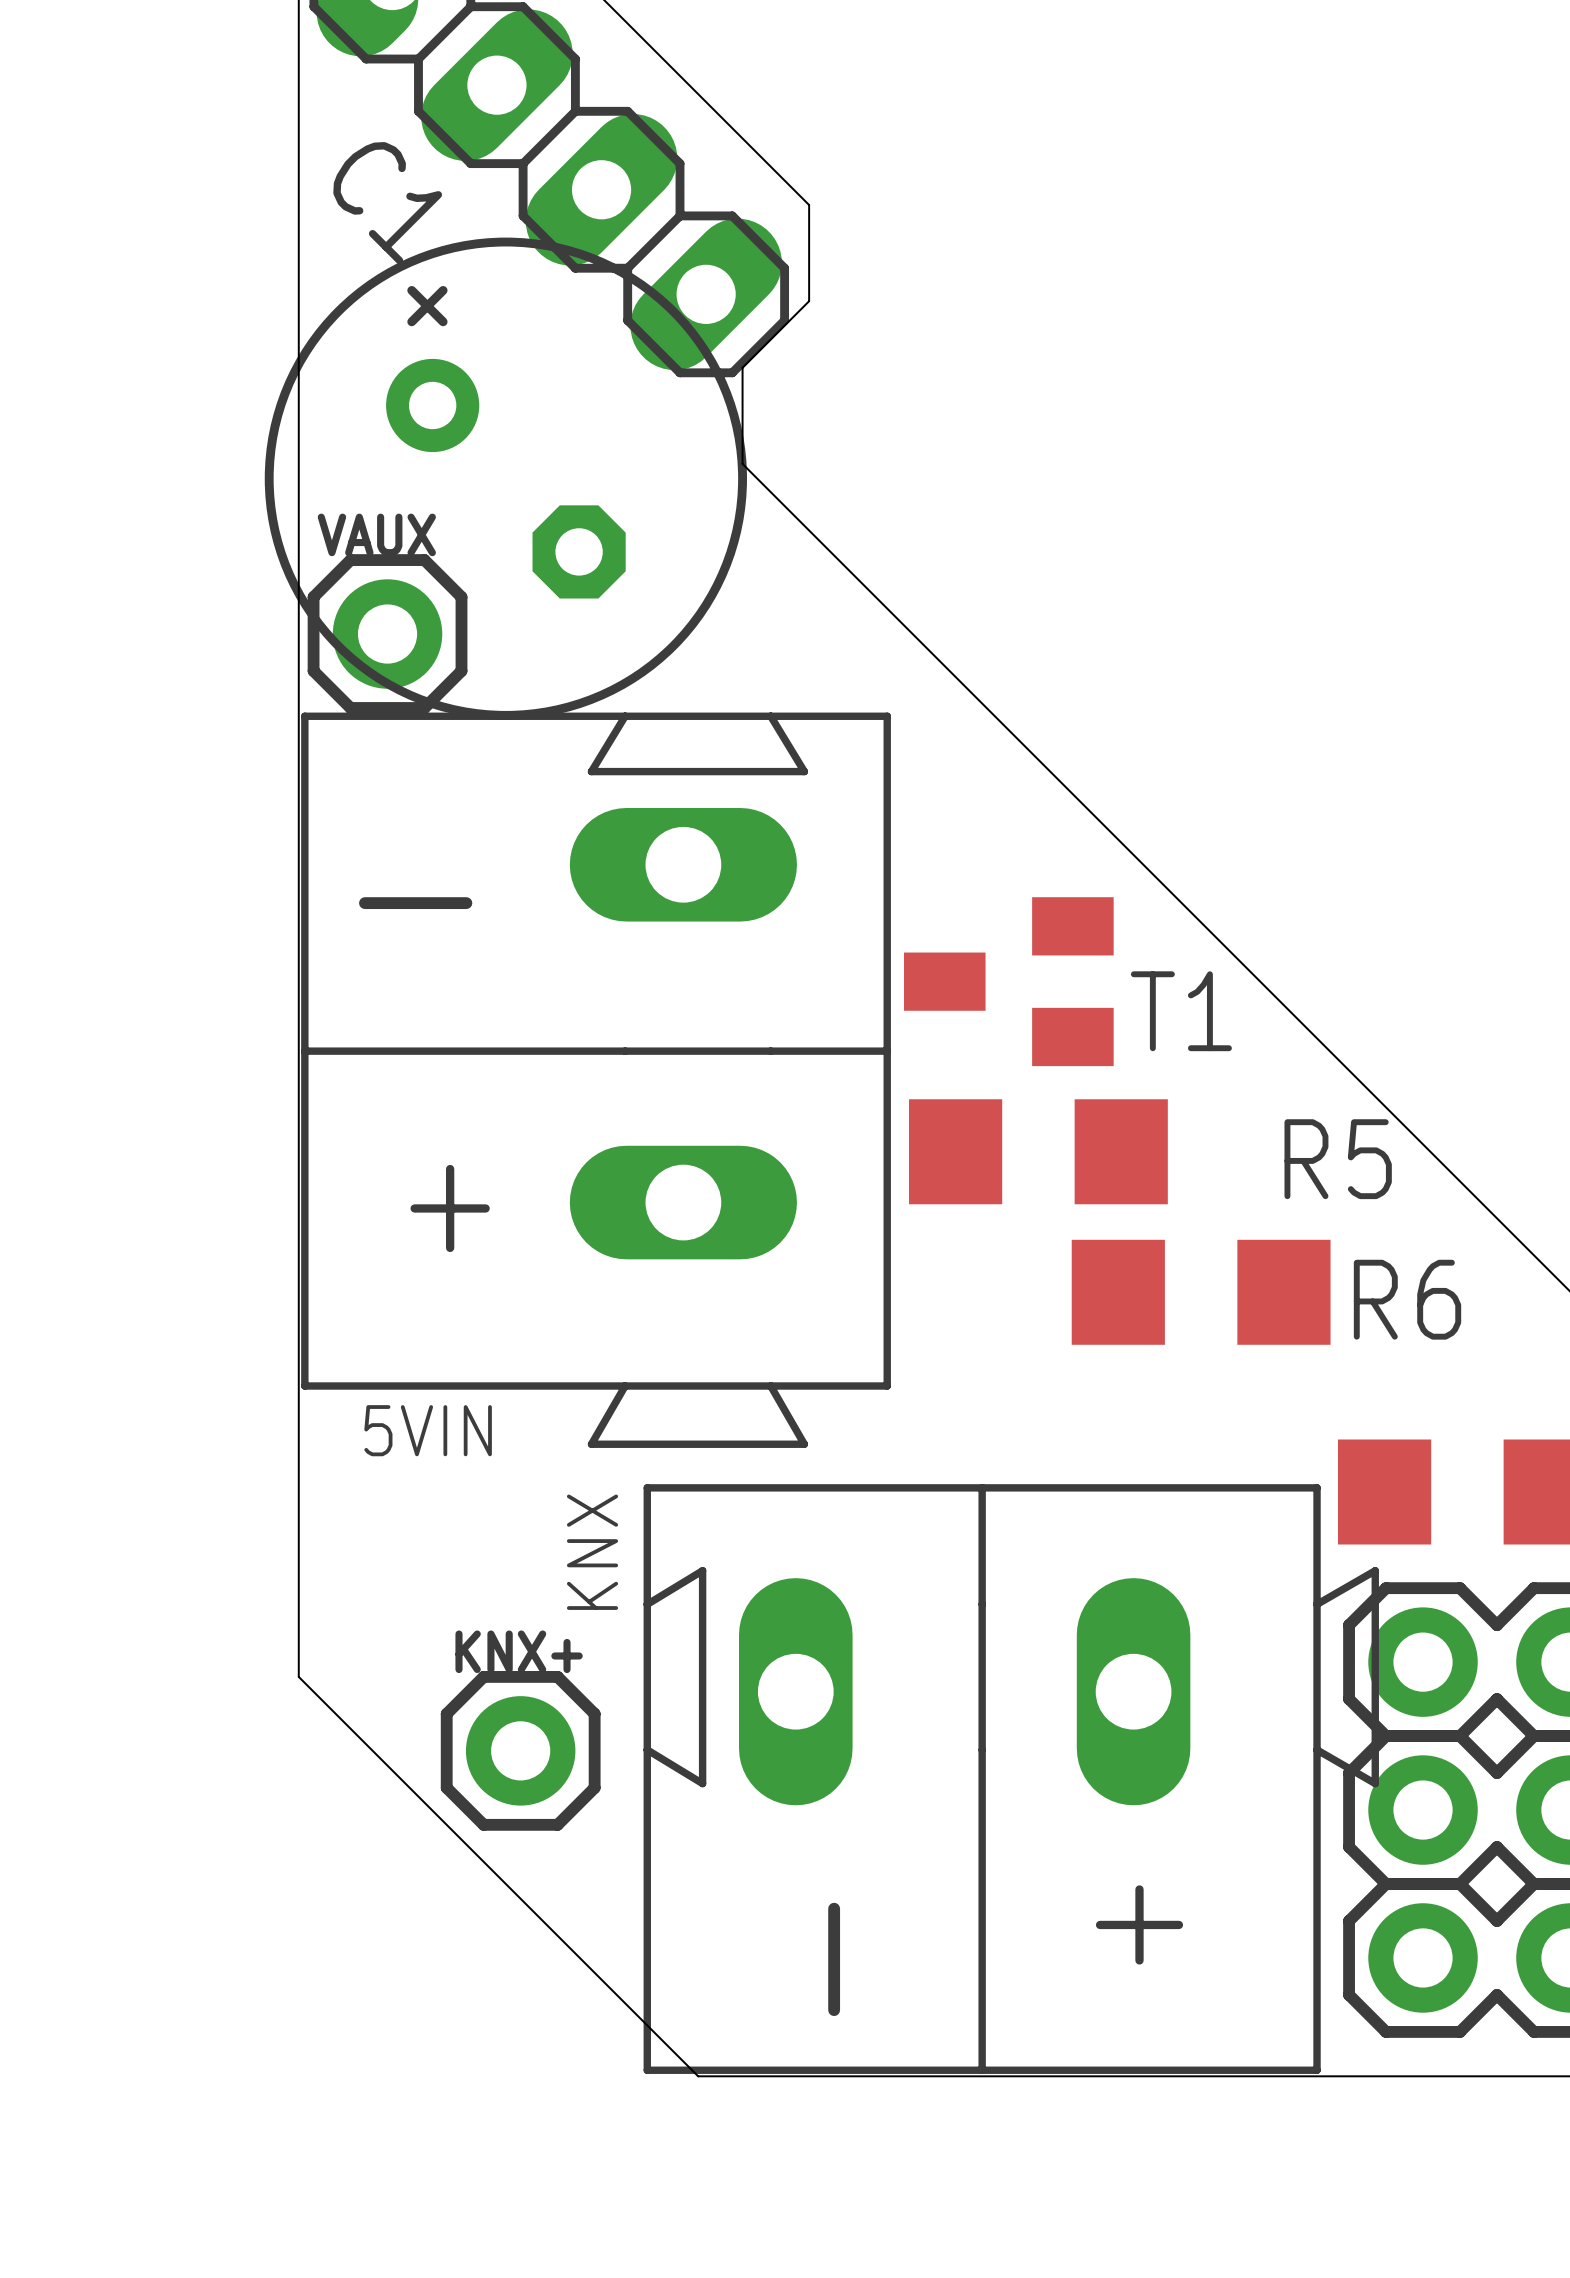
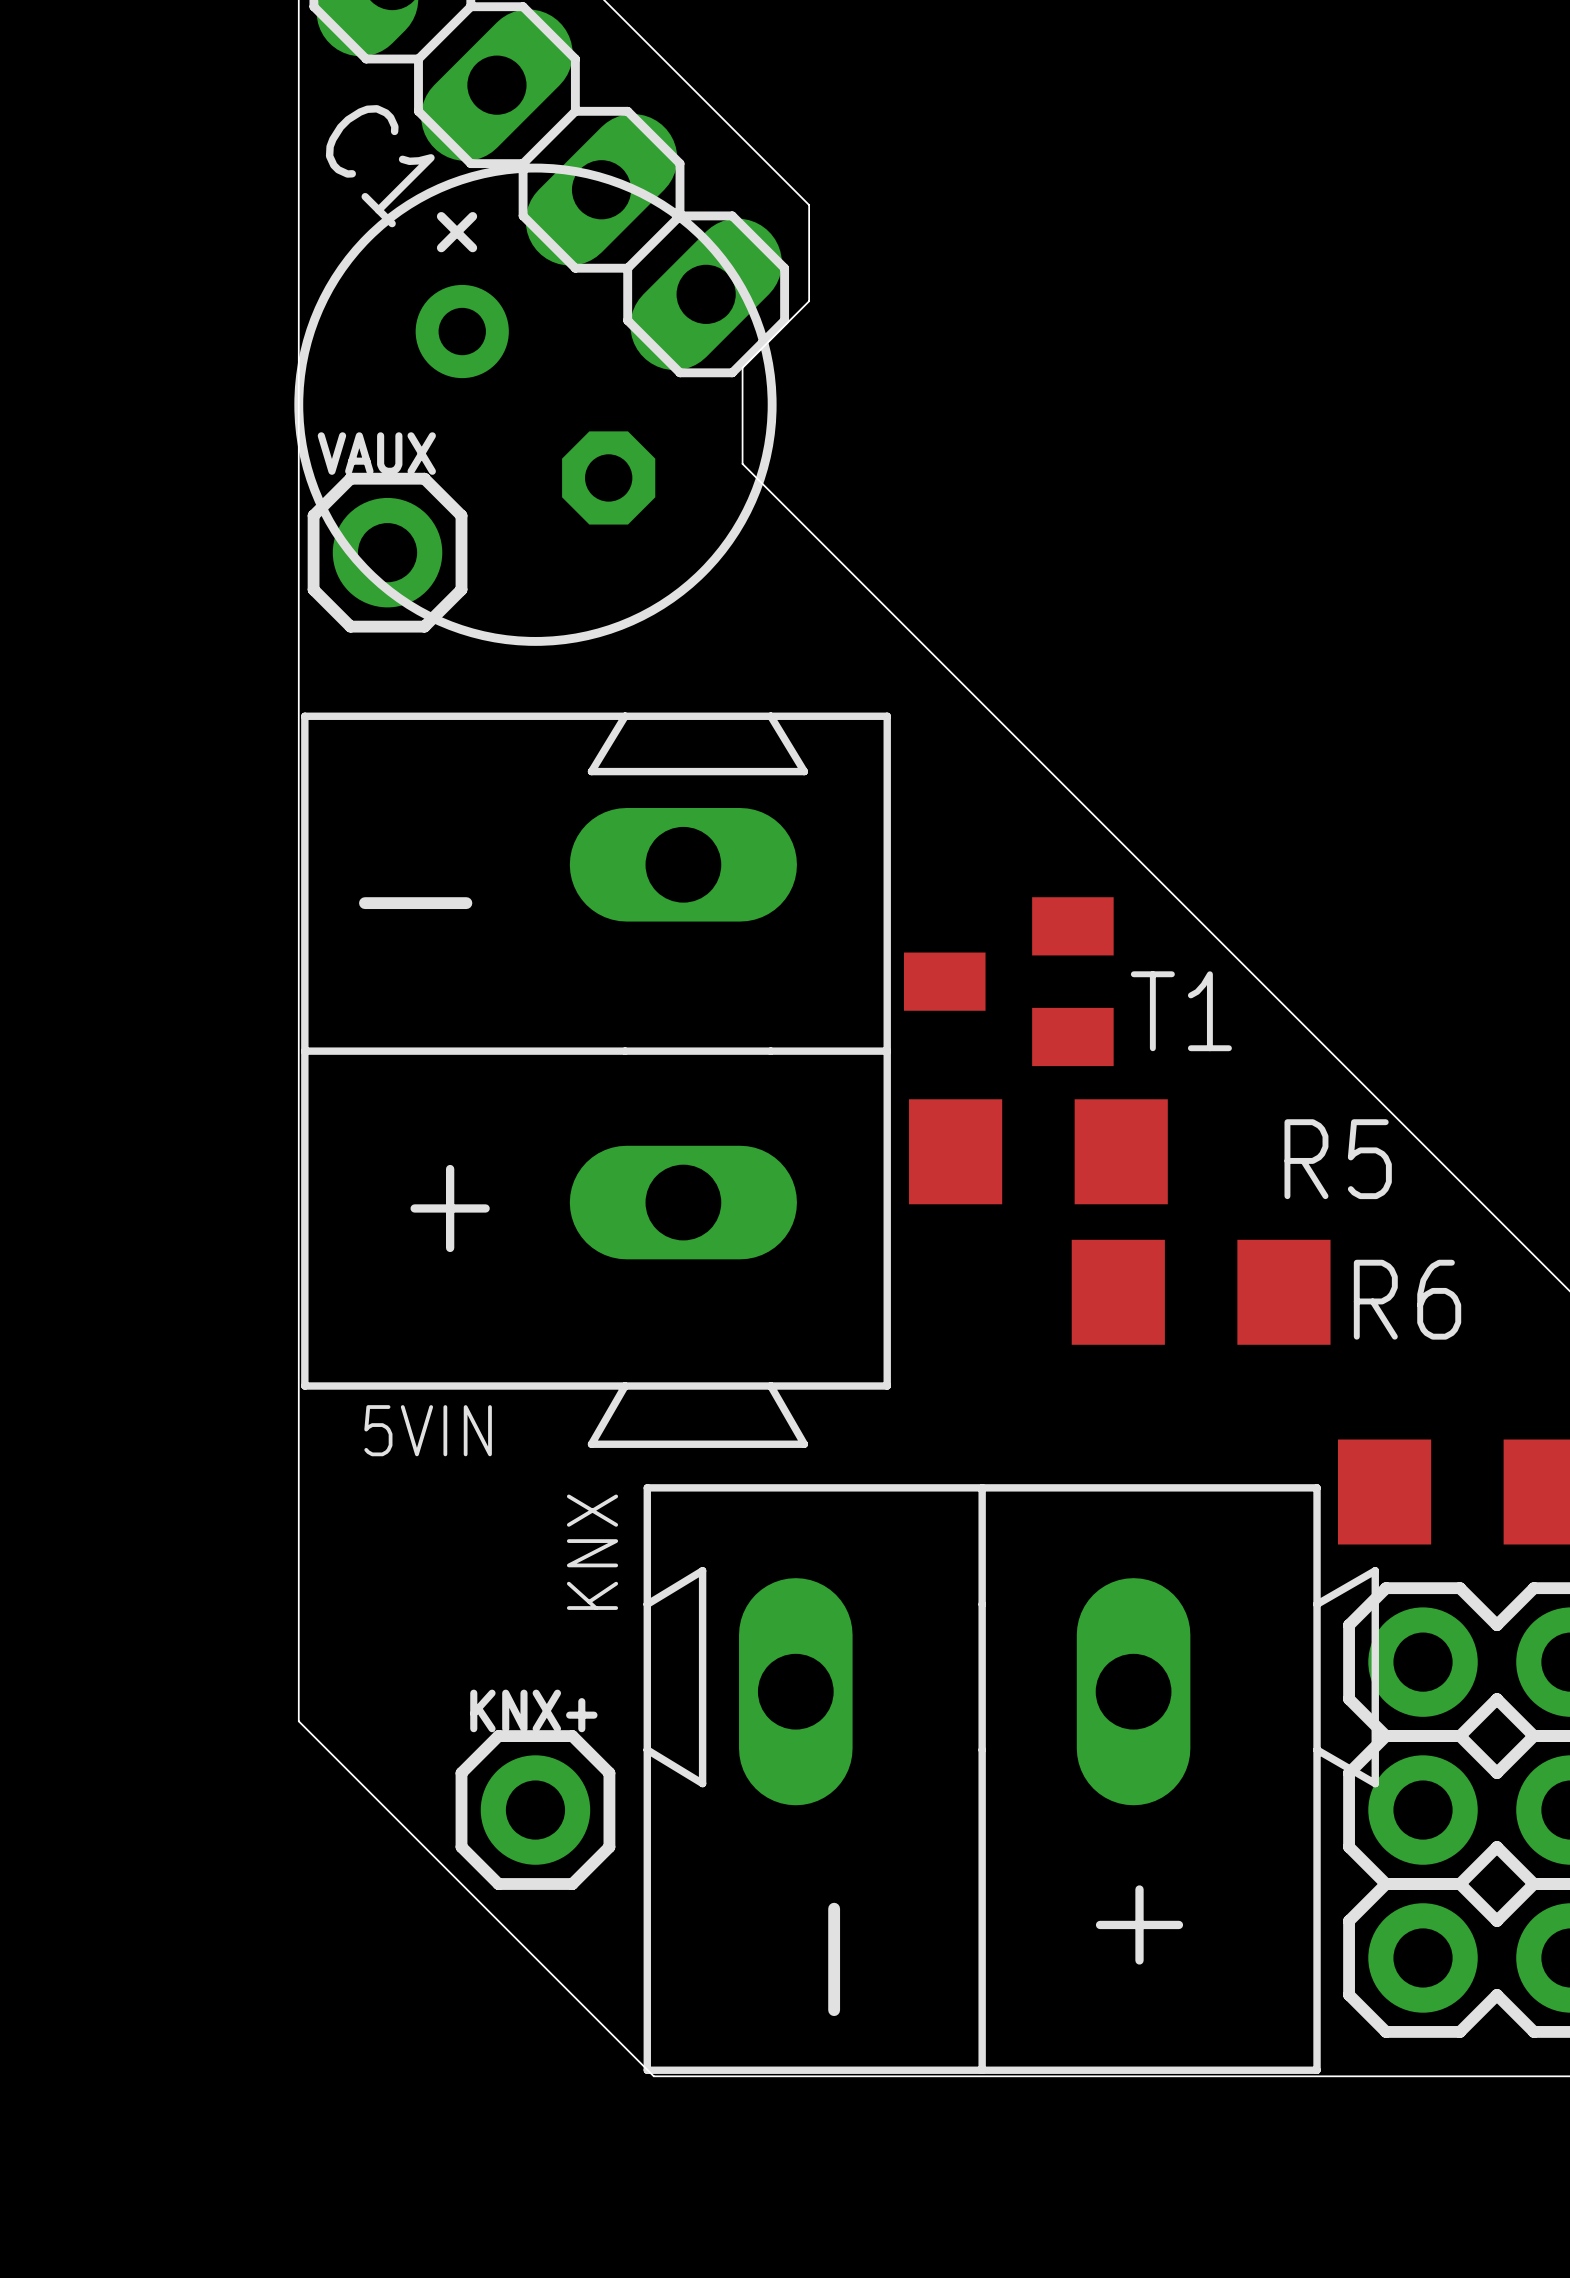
C1 name position: C1 (387, 203) -> C1 (380, 166)
C1 position: (505, 478) -> (535, 404)
VAUX position: (387, 634) -> (387, 552)
board edge: (298, 1676) (698, 2076) -> (298, 1676) (298, 1721) (653, 2076) (698, 2076)
KNX+ position: (520, 1750) -> (535, 1810)

